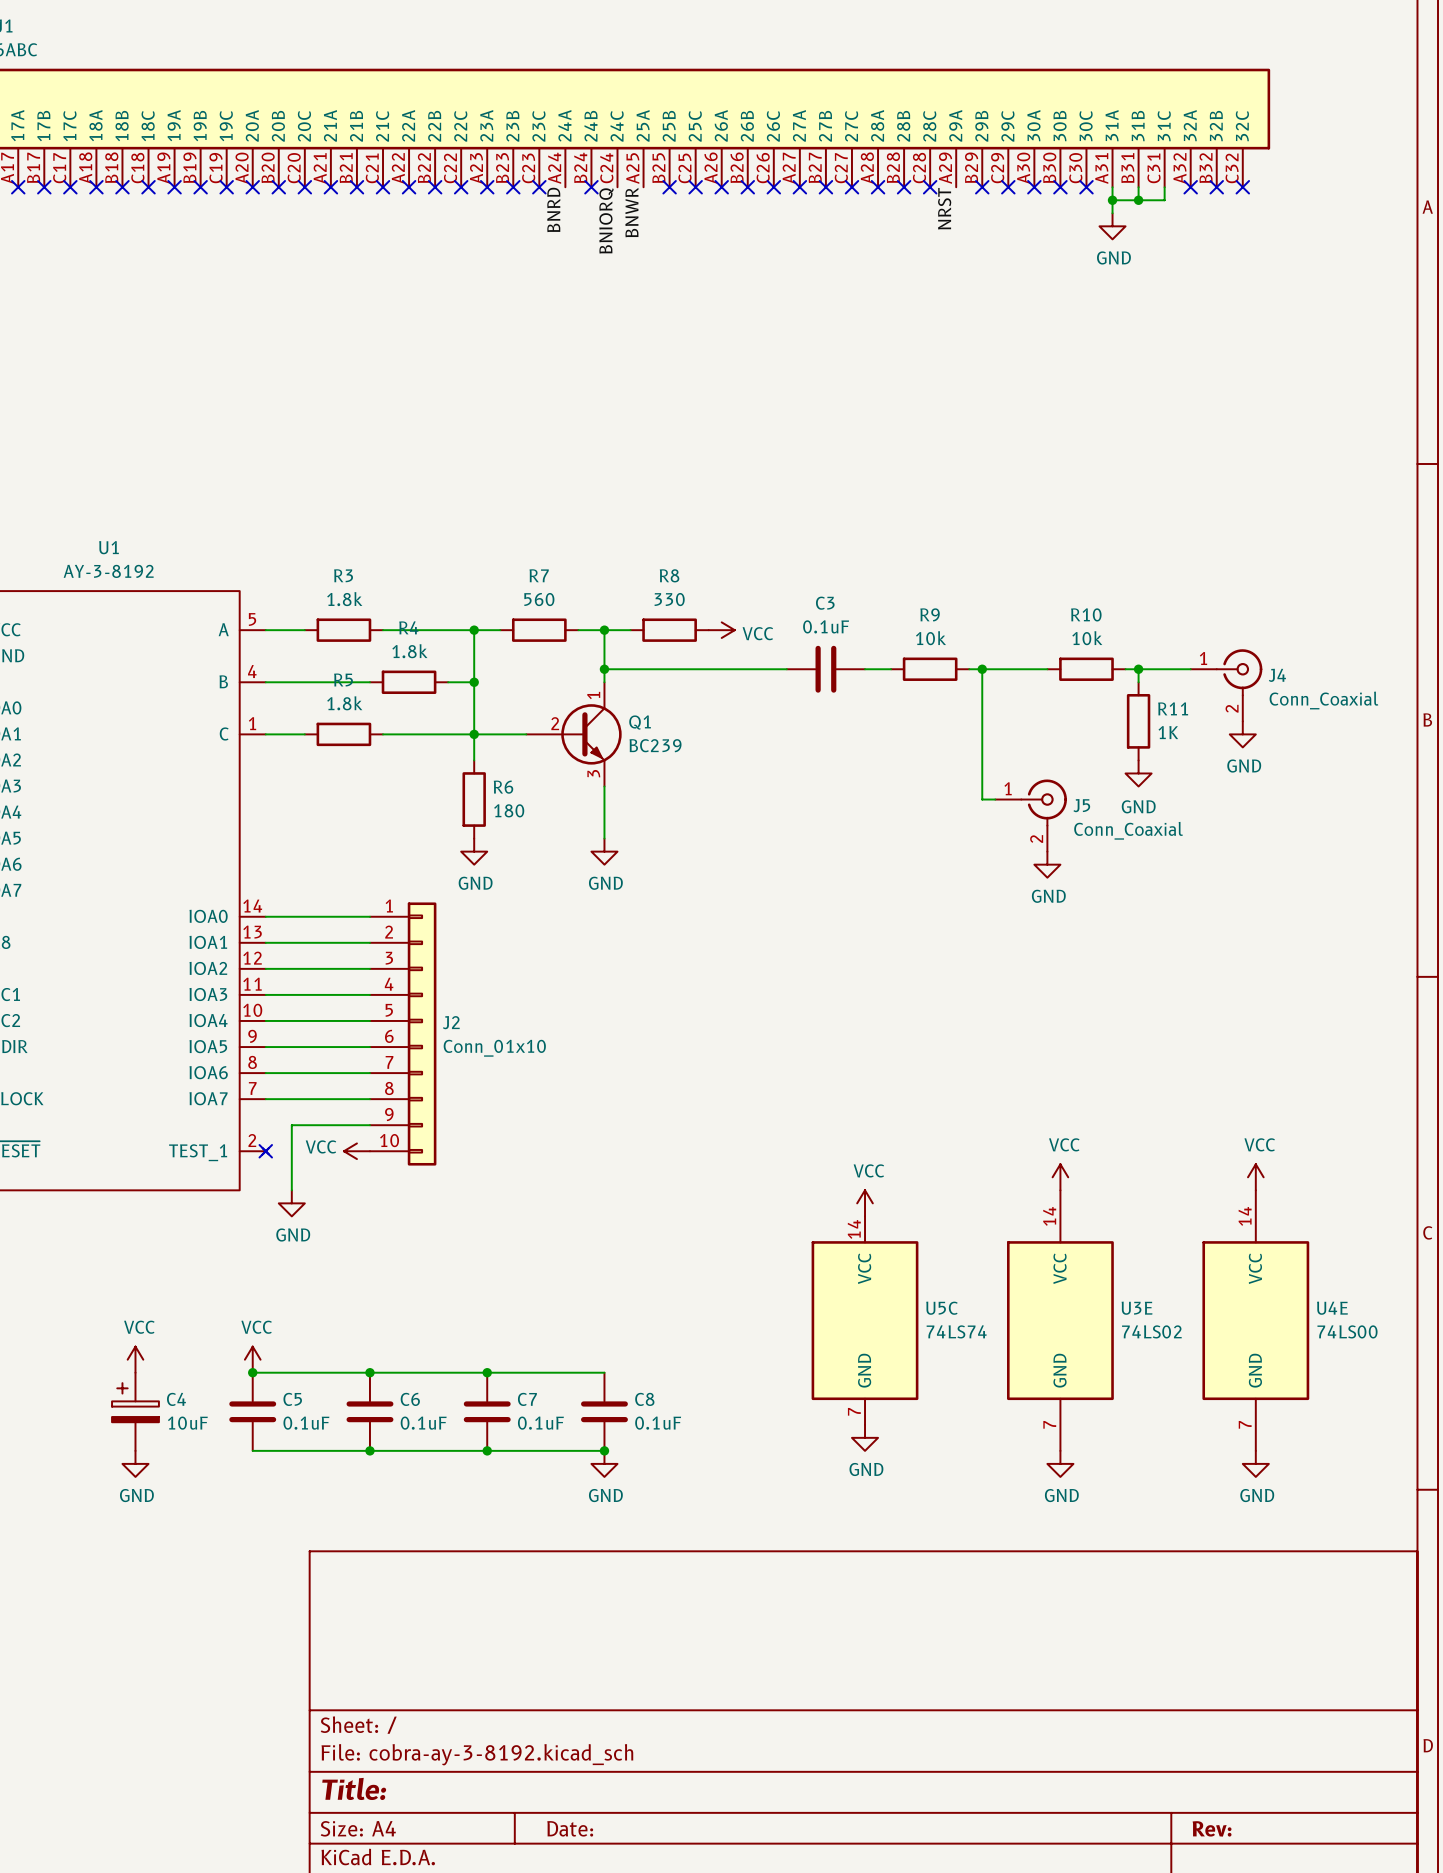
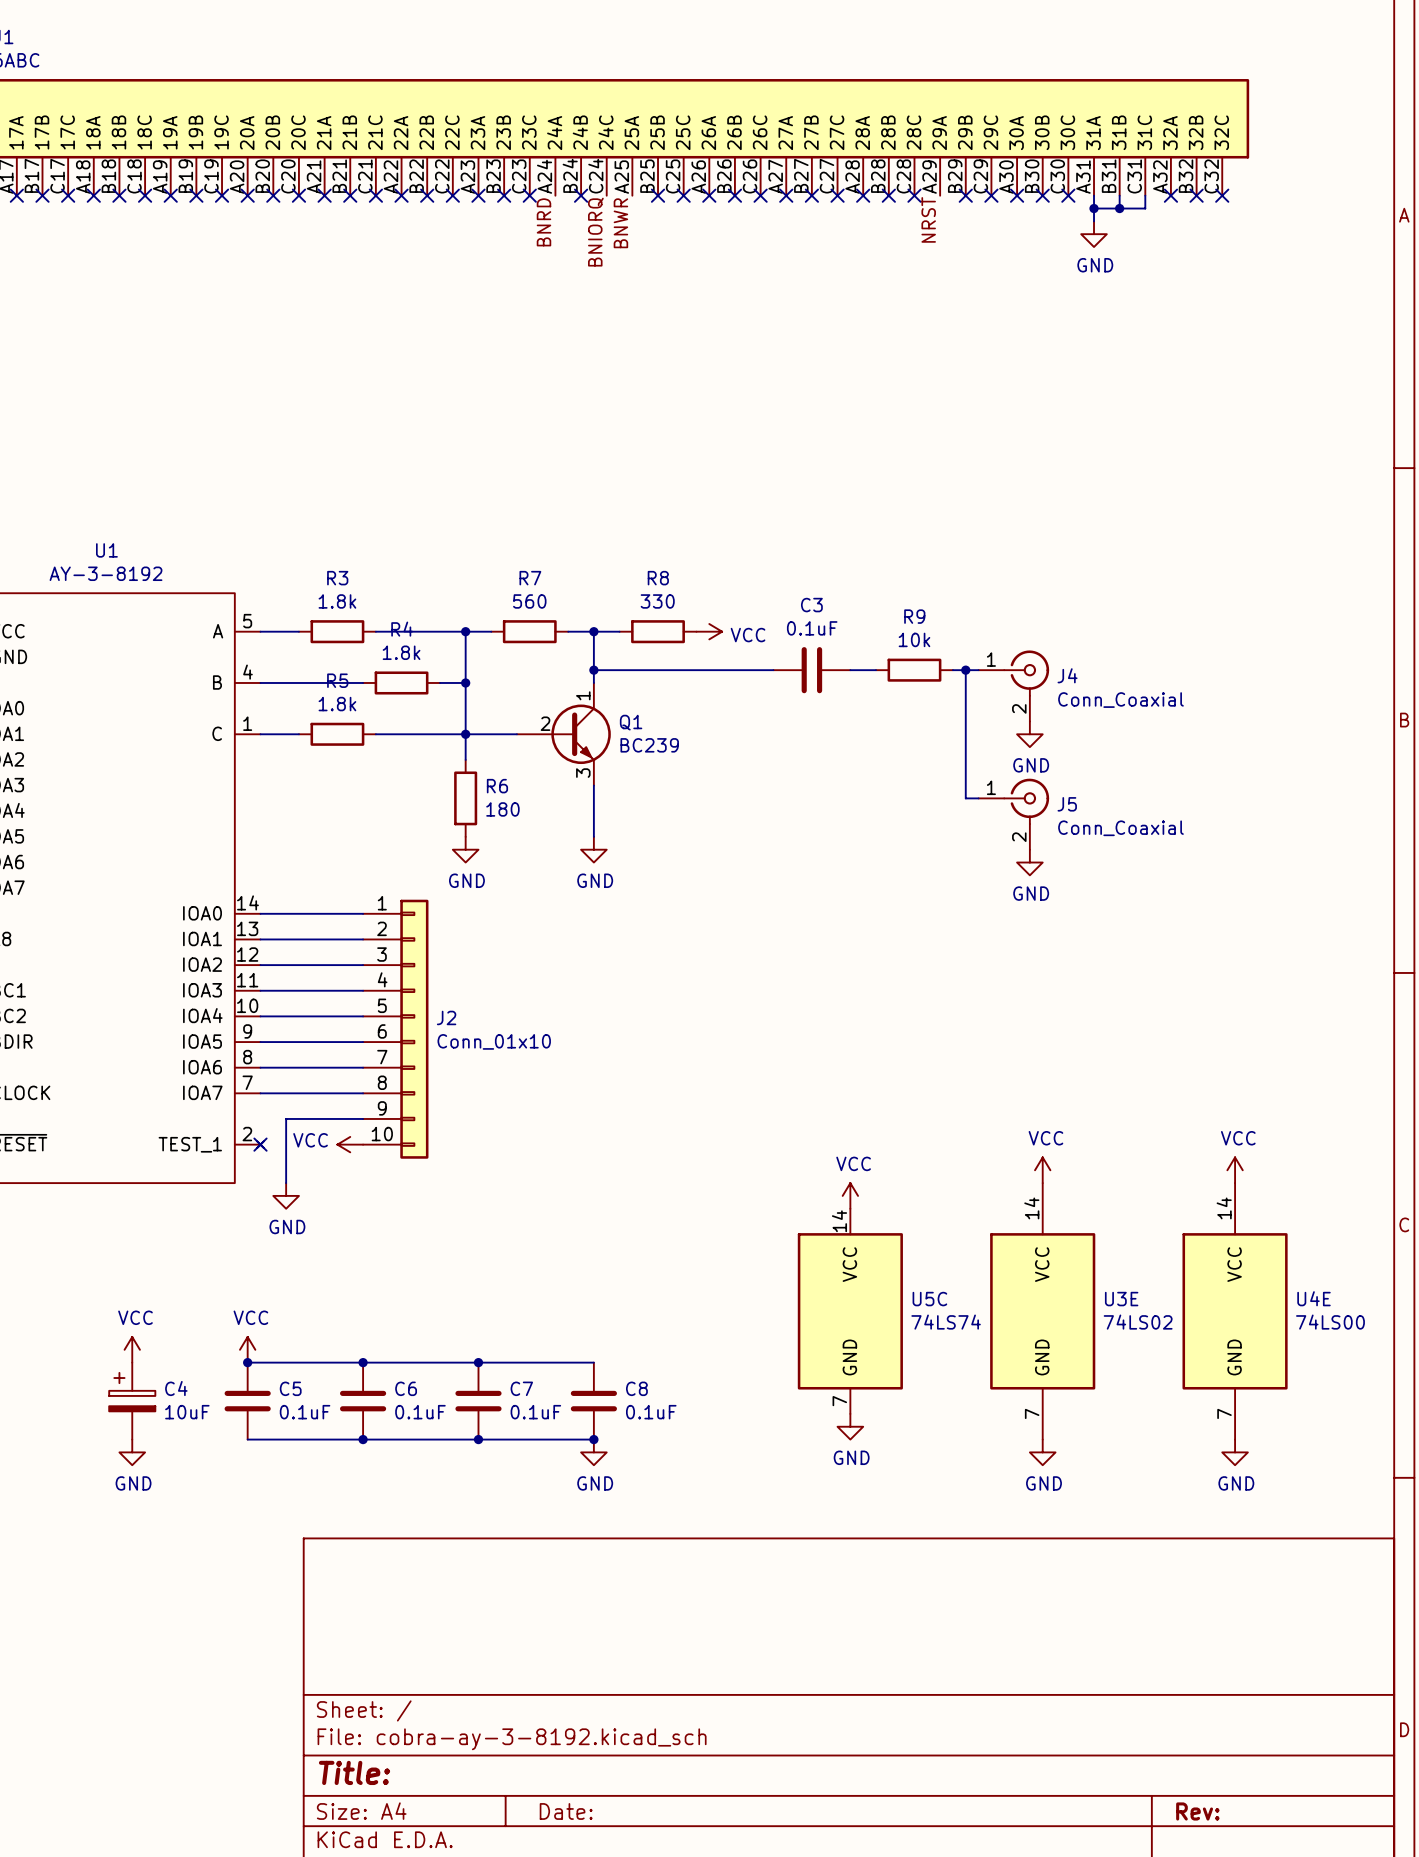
R10: 10k (1086, 669) -> none
wire: (1125, 669) (1190, 669) -> none
wire: (1138, 669) (1138, 682) -> none
junction: (1138, 669) -> none
J4 position: (1226, 685) -> (1013, 685)
R11: 1K (1138, 721) -> none
power symbol: none -> GND (1029, 734)
power symbol: GND (1242, 734) -> none
power symbol: GND (1138, 773) -> none

